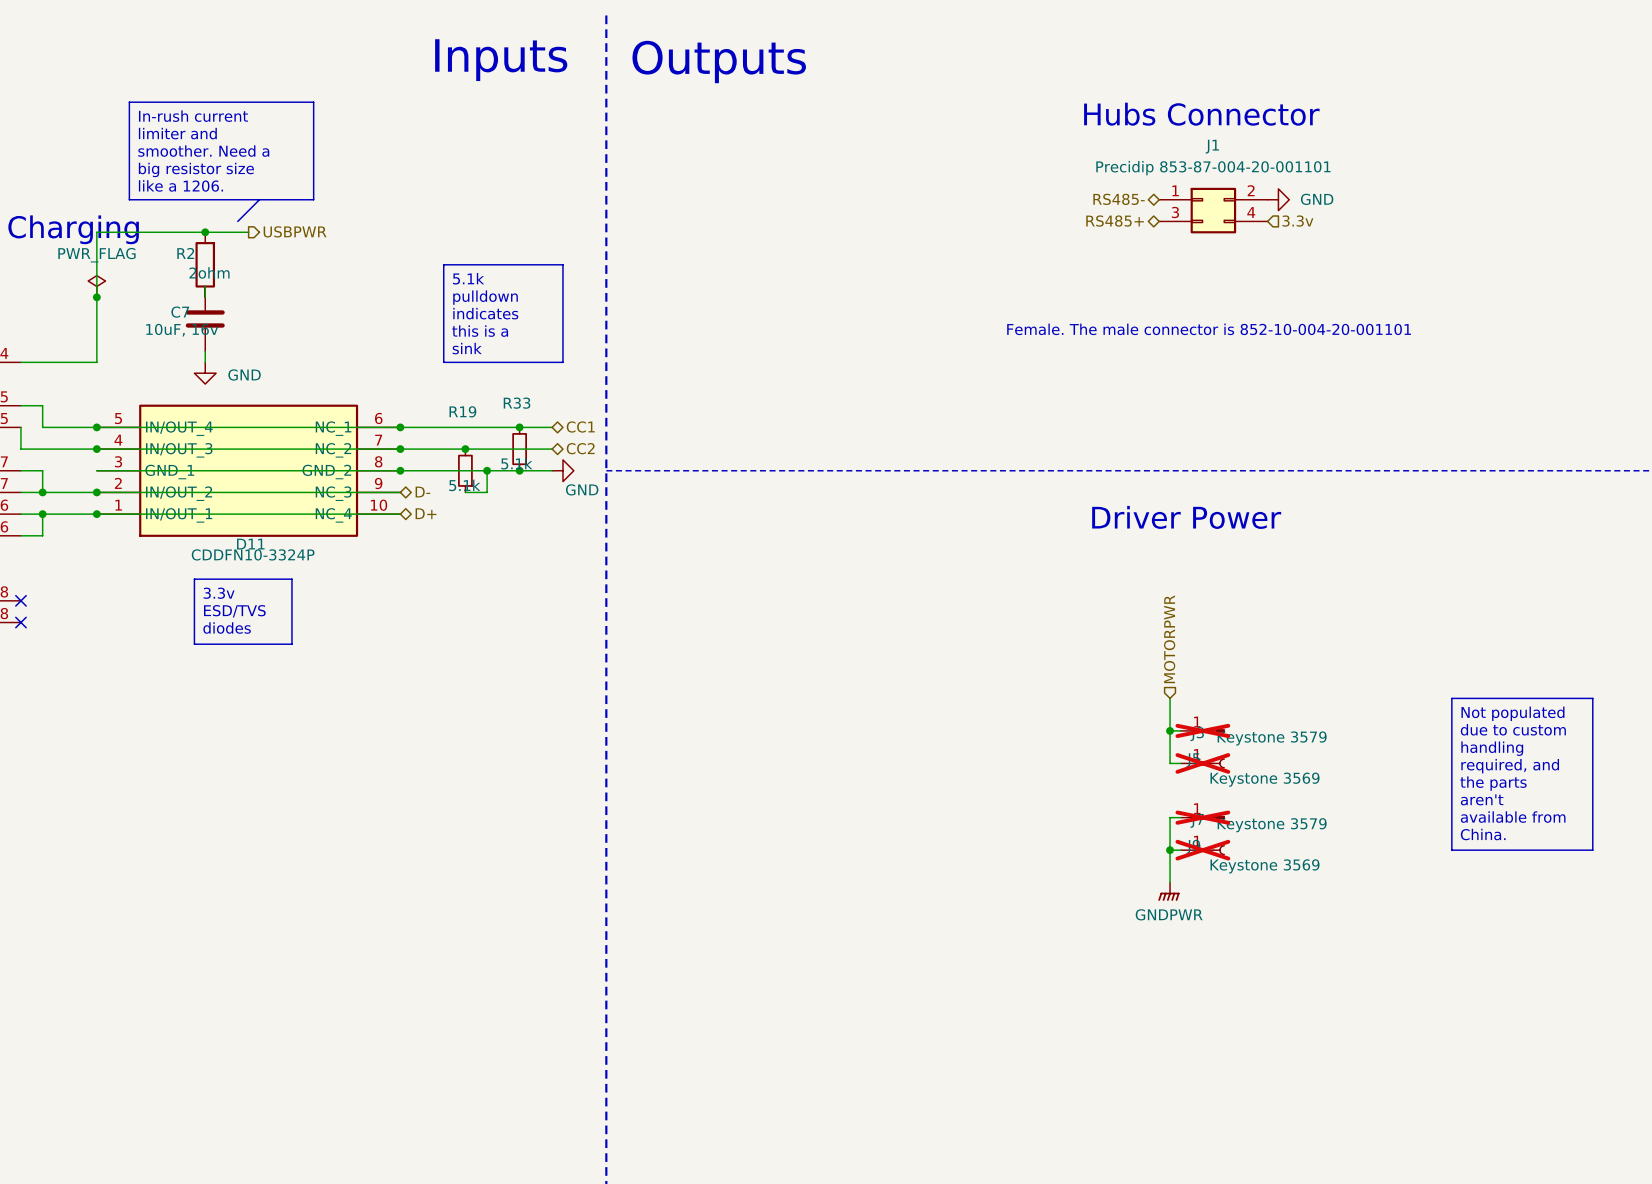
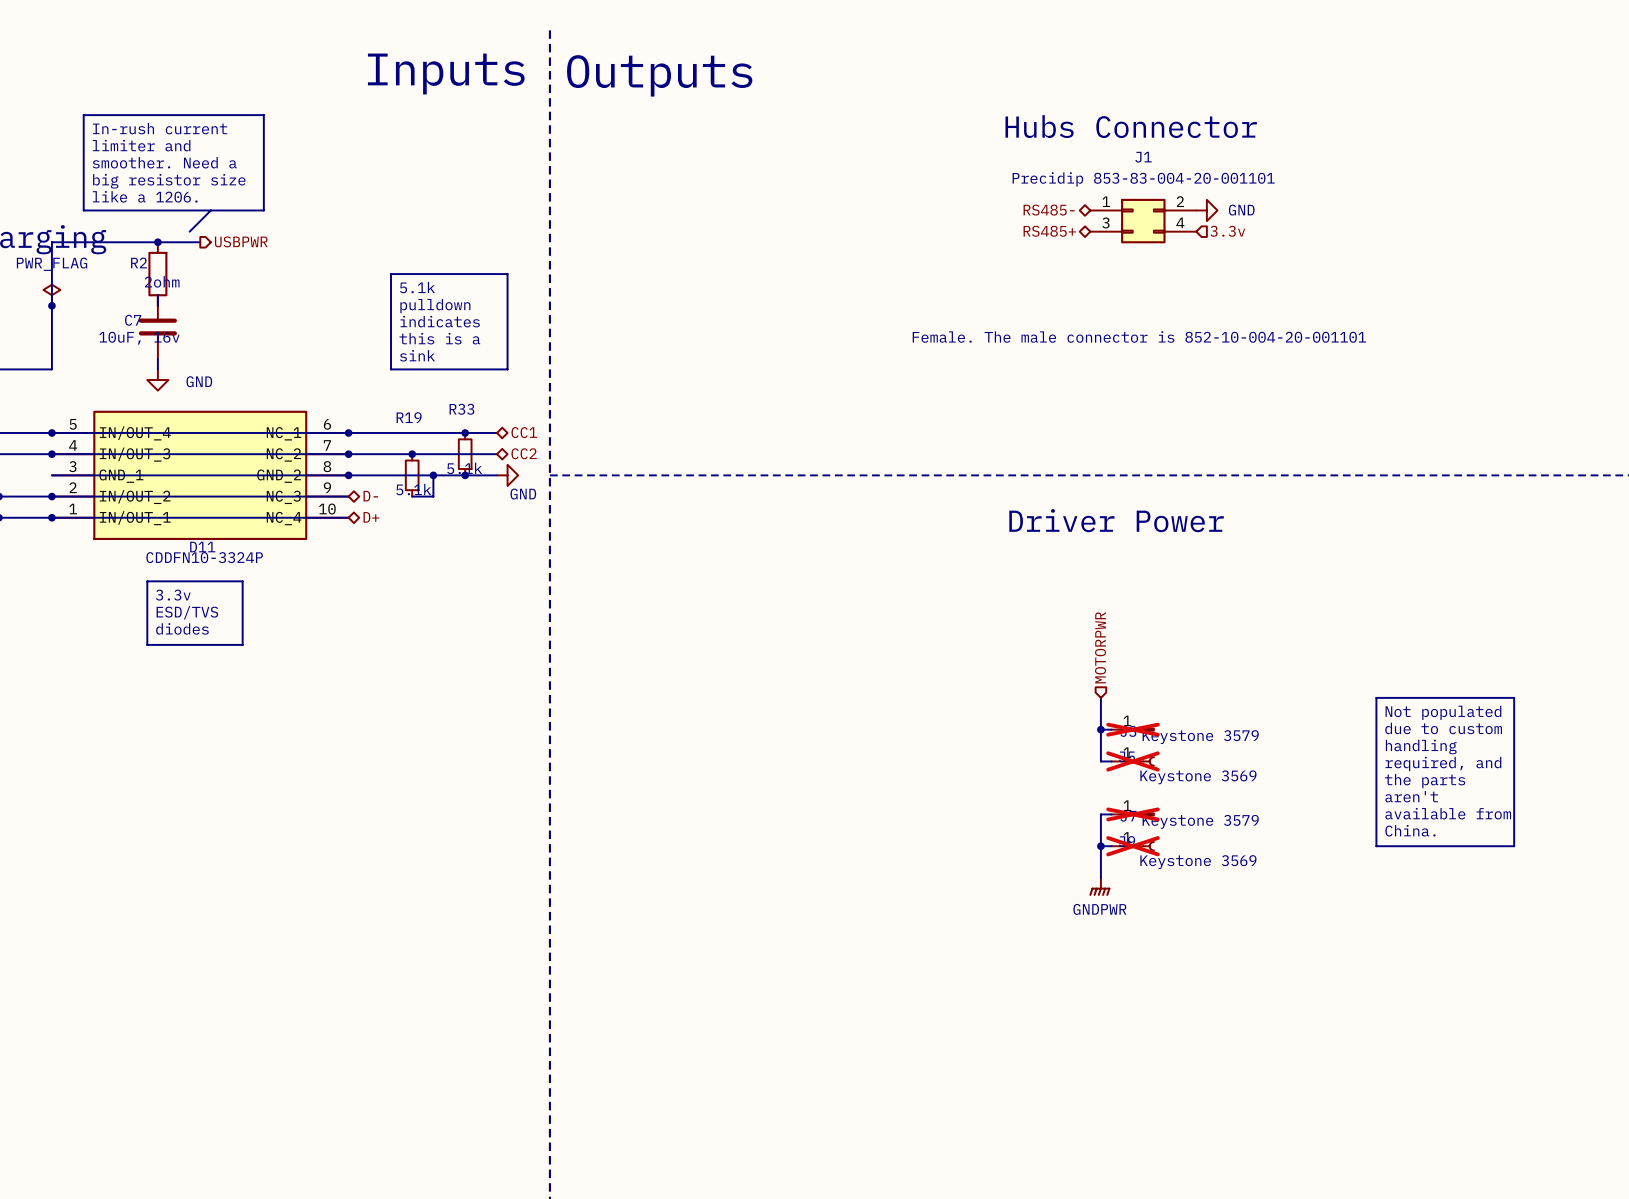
J1 value: Precidip 853-87-004-20-001101 (1213, 168) -> Precidip 853-83-004-20-001101 (1143, 179)

